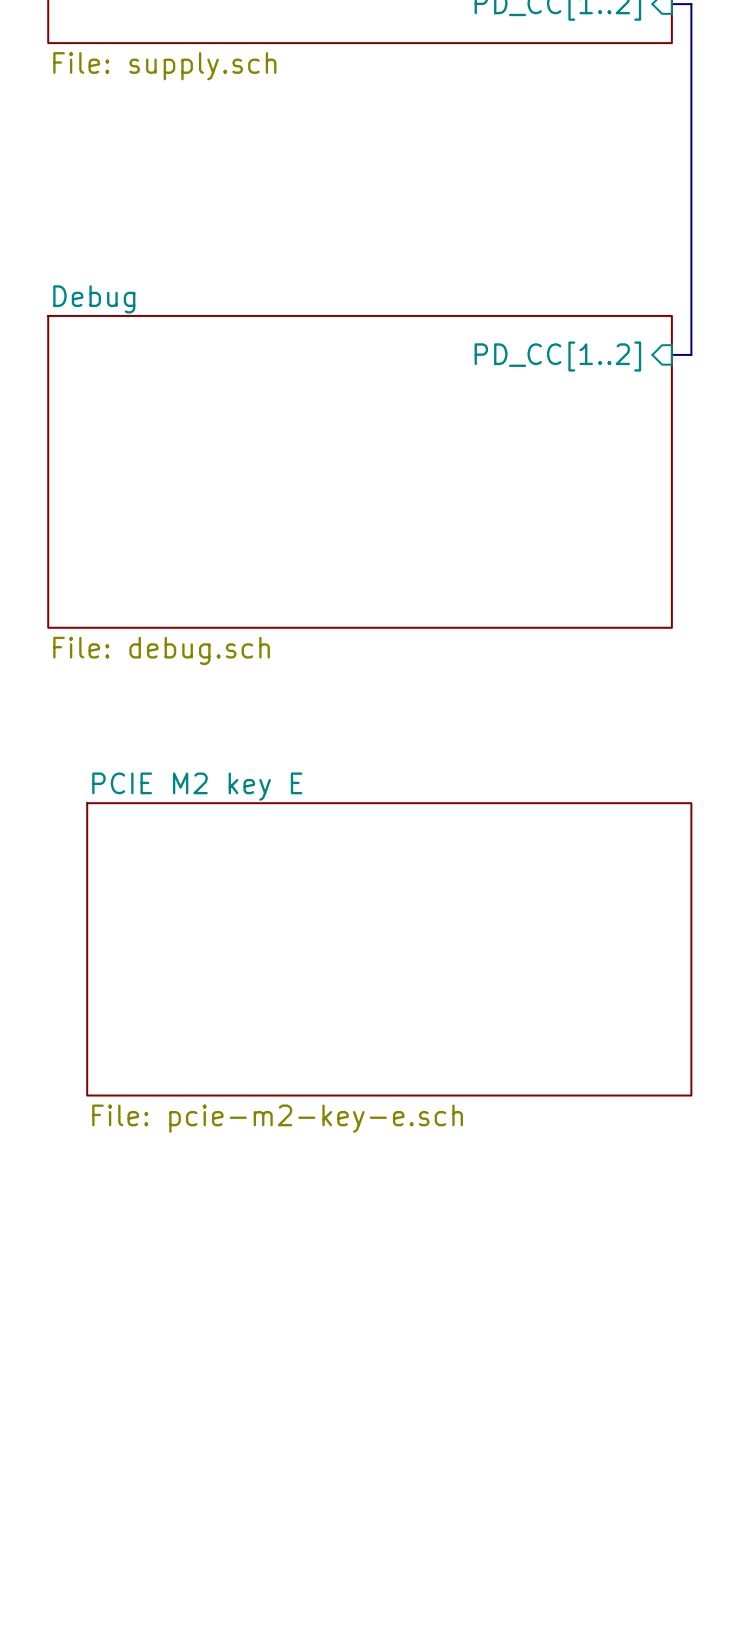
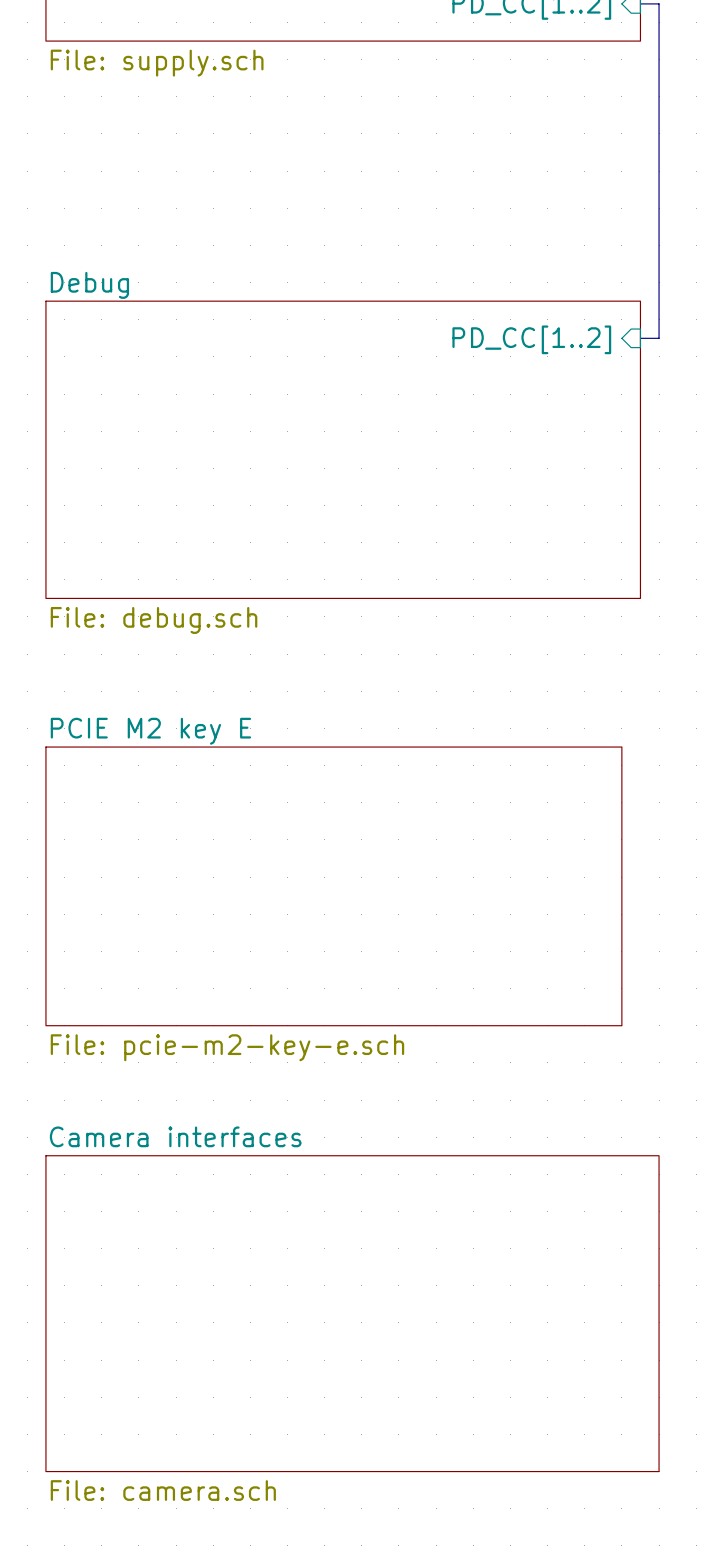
sheet PCIE M2 key E position: (389, 949) -> (333, 886)
sheet Camera interfaces: none -> File: camera.sch (352, 1313)

